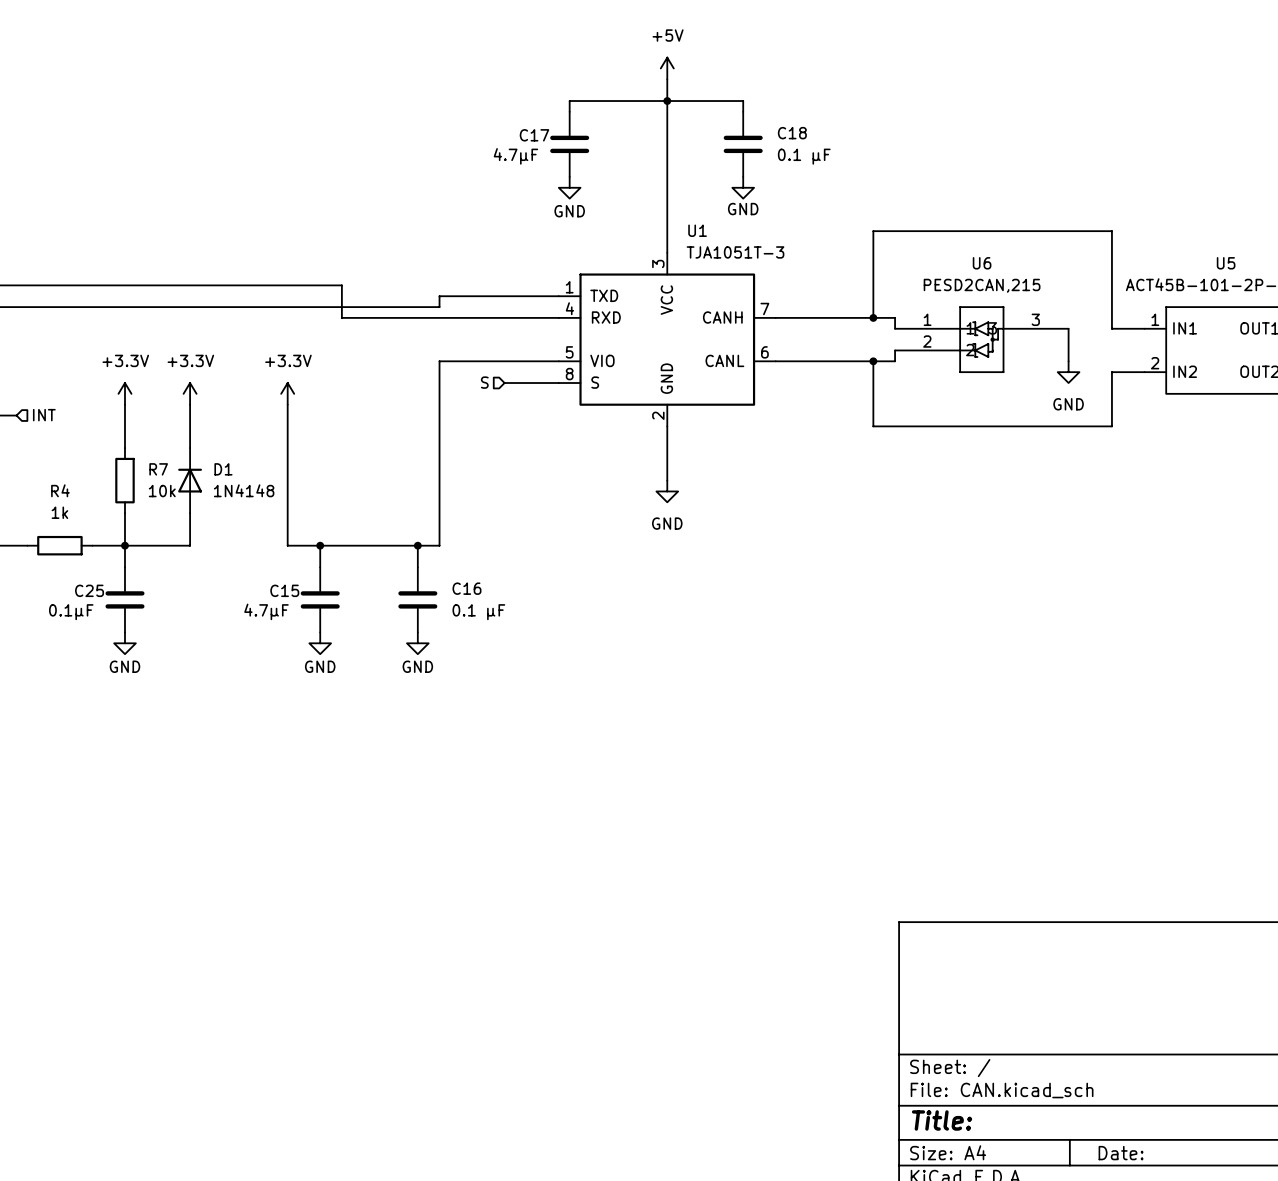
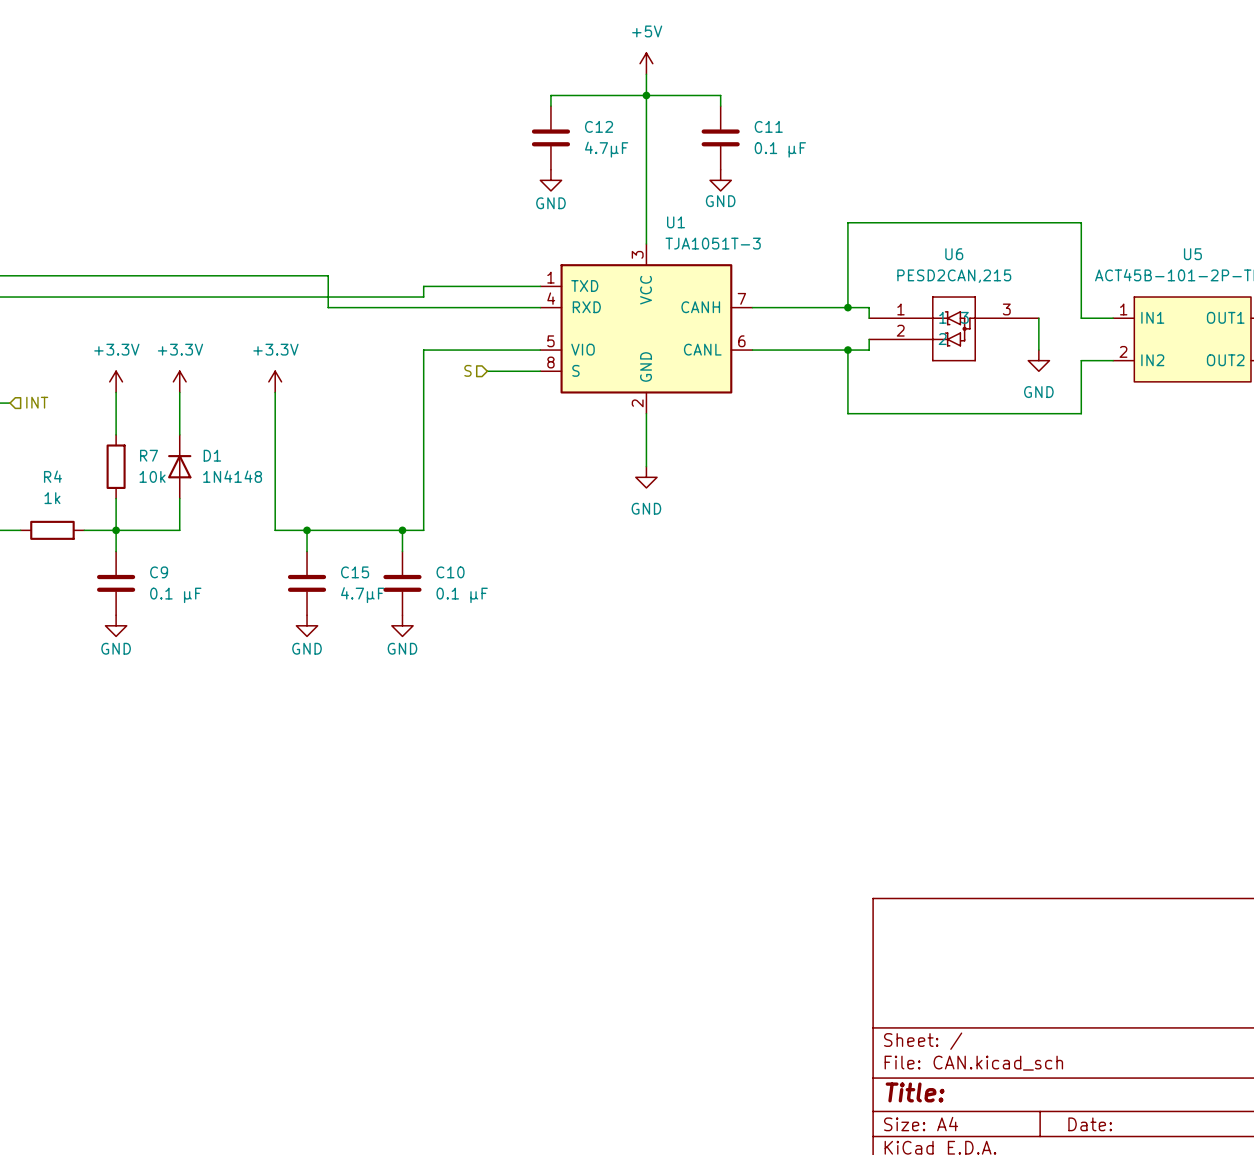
C18 name: C18 (792, 133) -> C11 (768, 126)
C17 name: C17 (534, 135) -> C12 (599, 126)
C17 value position: 4.7µF (515, 156) -> 4.7µF (606, 149)
C16 name: C16 (466, 588) -> C10 (450, 572)
C25 name: C25 (89, 590) -> C9 (159, 572)
C15 name position: C15 (284, 590) -> C15 (355, 572)
C15 value position: 4.7µF (266, 611) -> 4.7µF (362, 595)
C25 value: 0.1µF (71, 612) -> 0.1 µF (175, 595)

